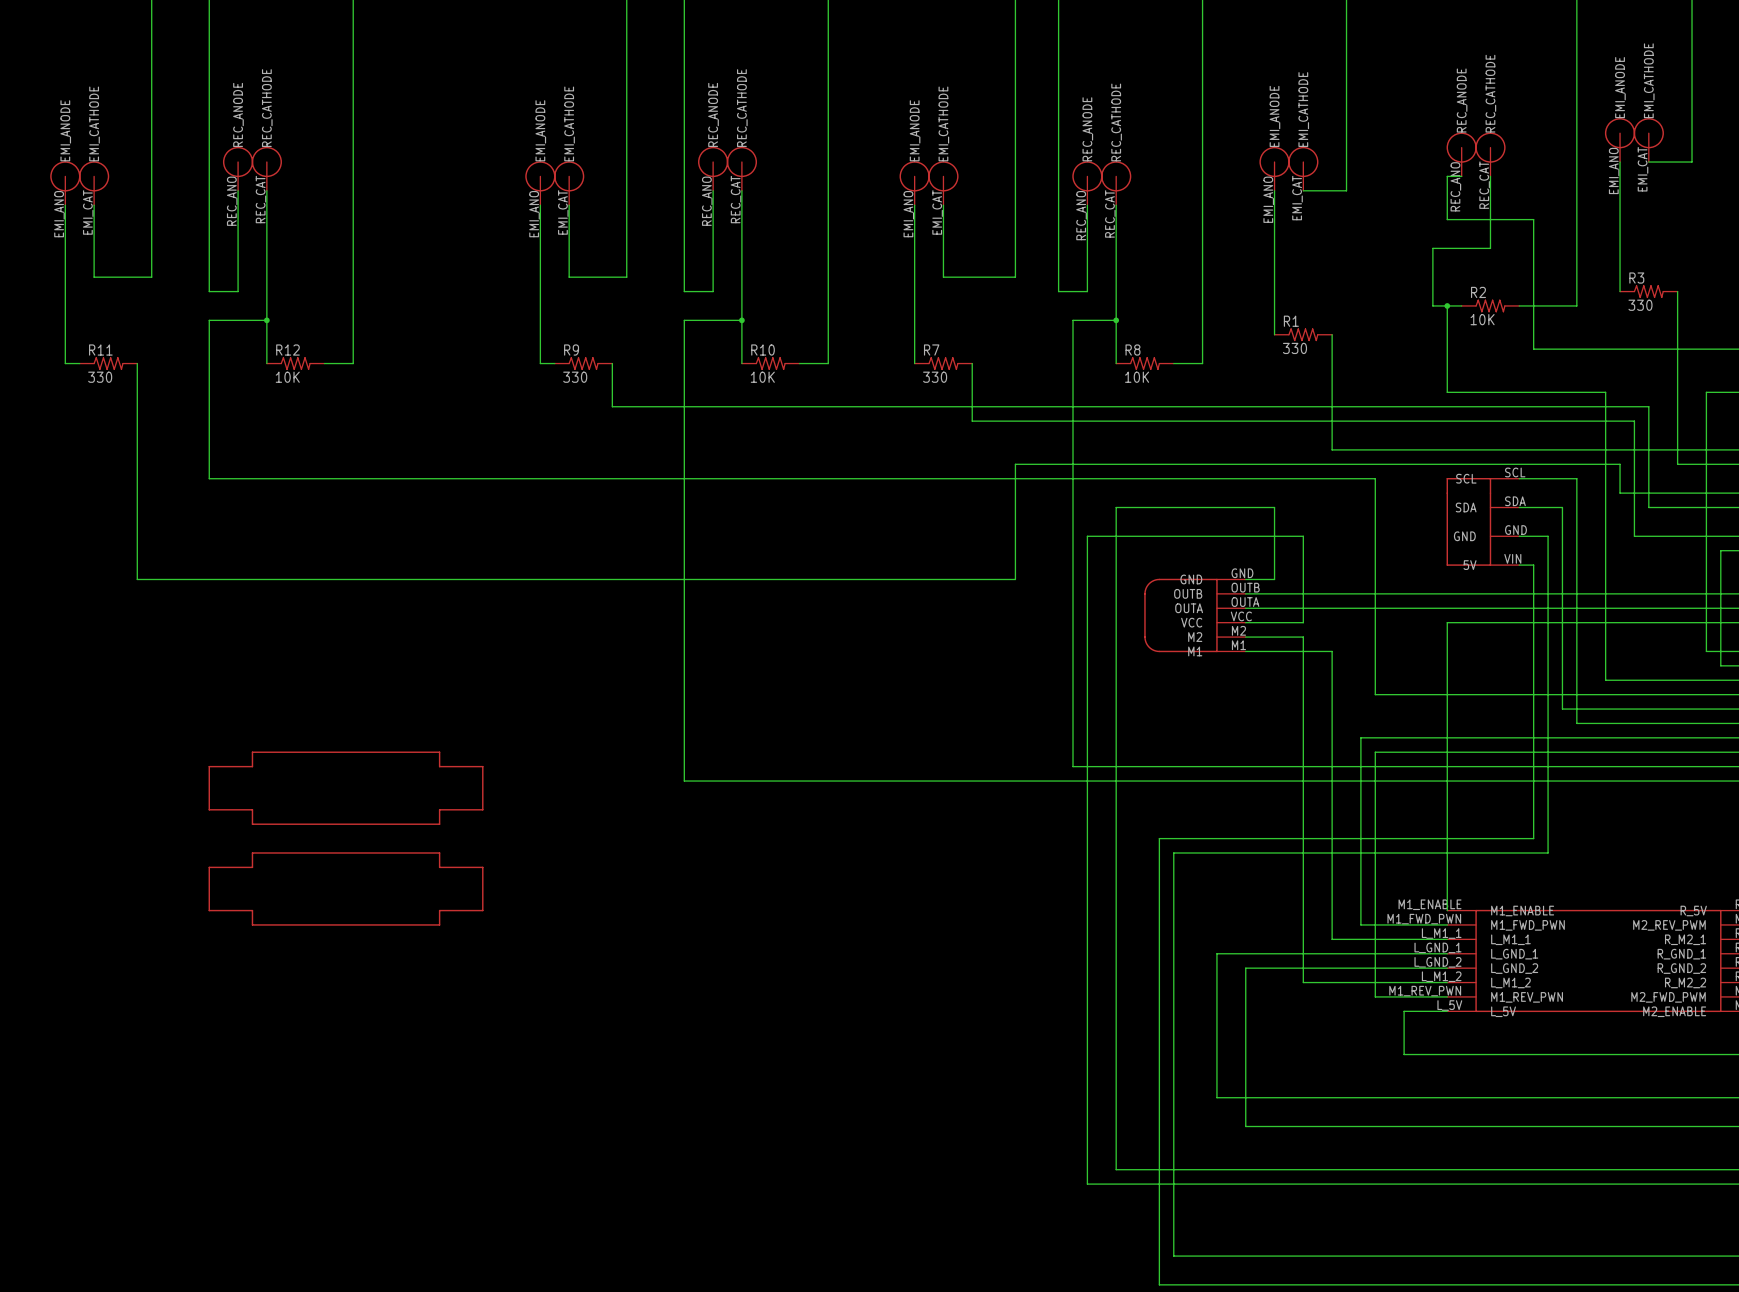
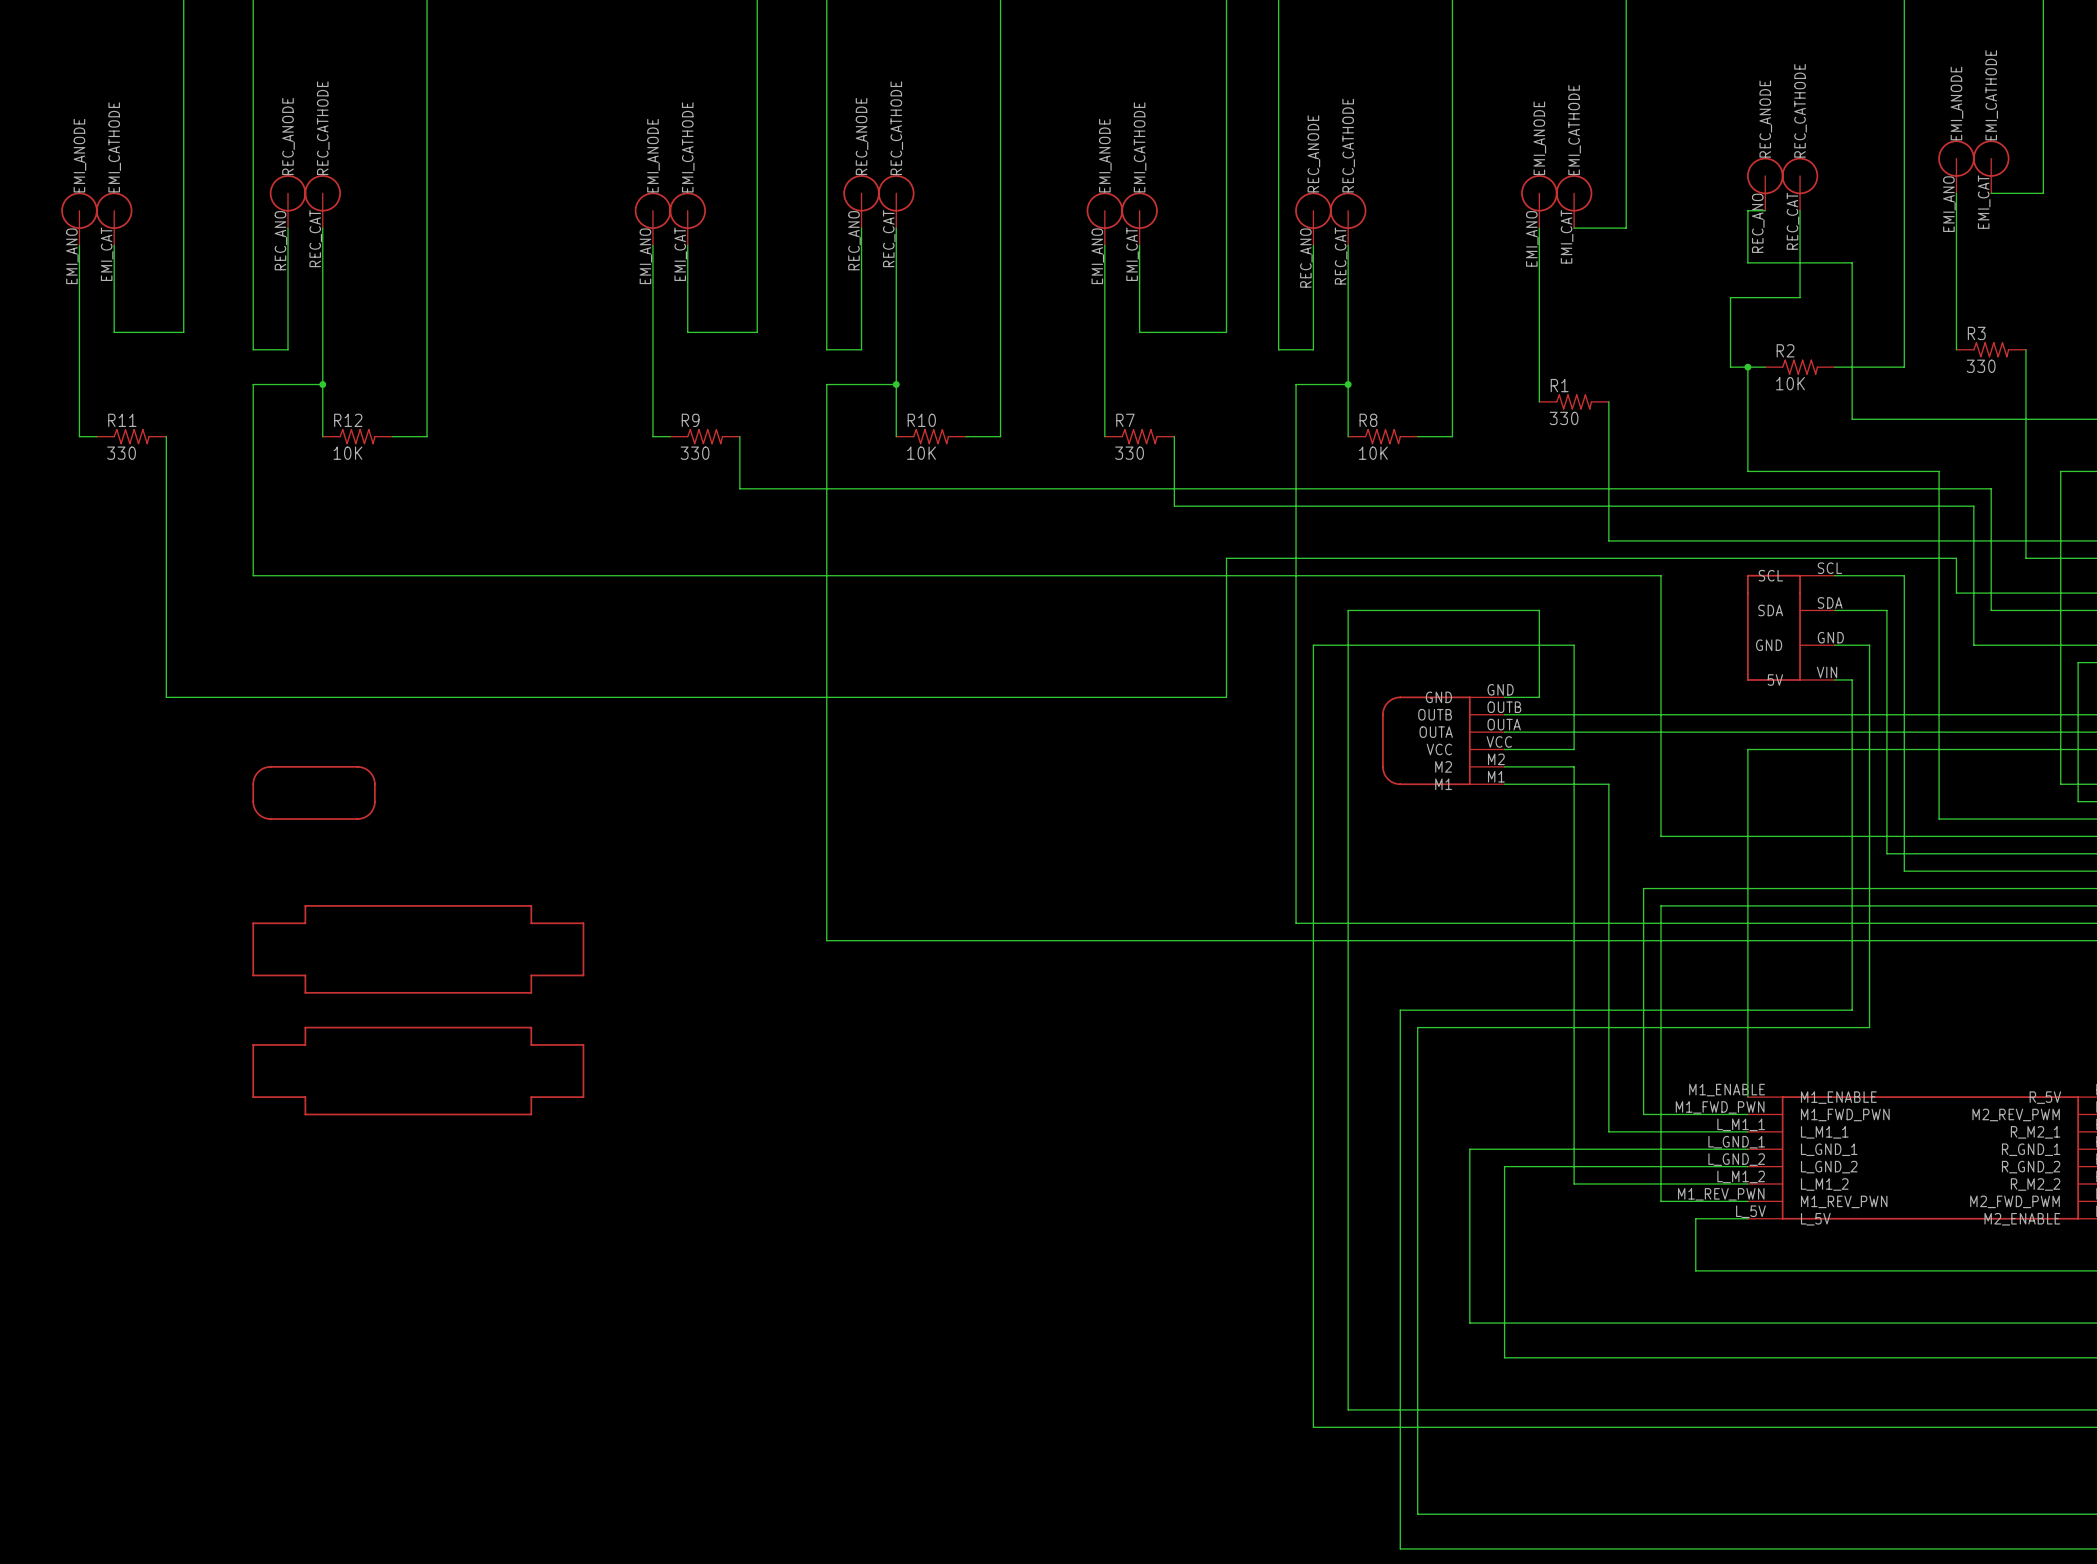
part: none -> (314, 792)

